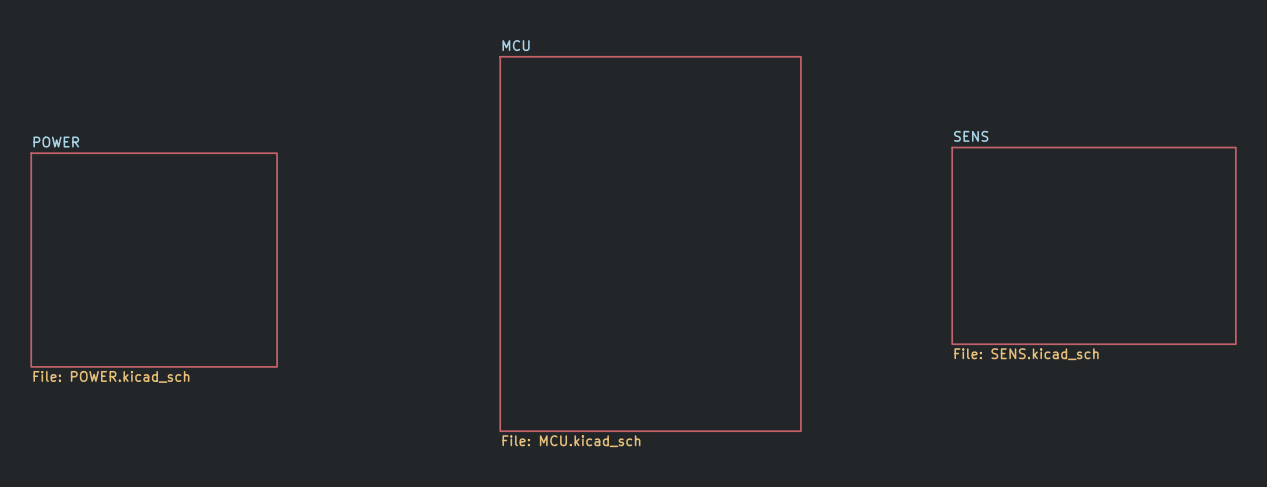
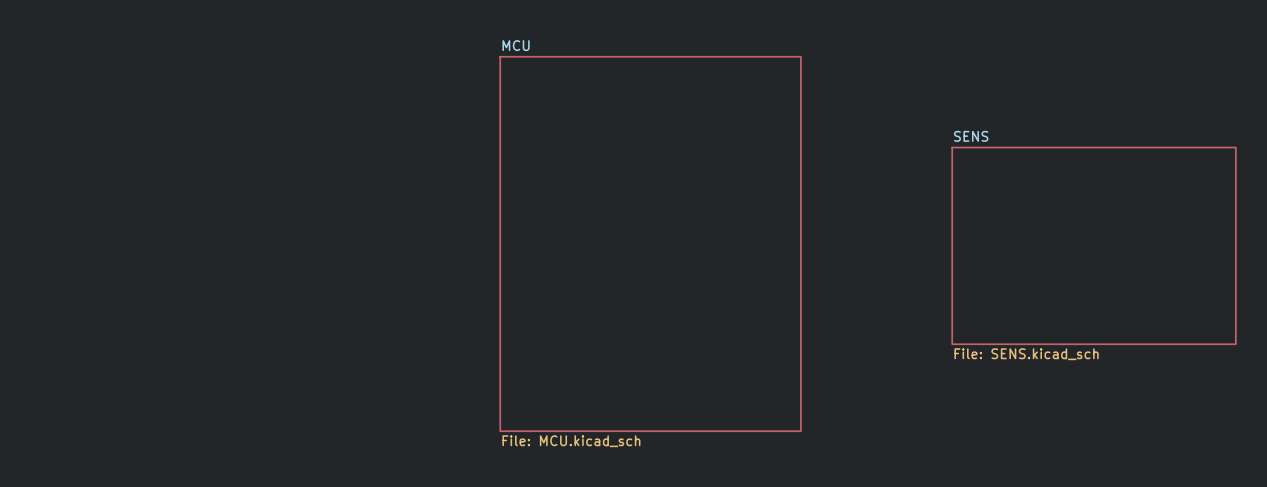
sheet POWER: File: POWER.kicad_sch (154, 260) -> none

